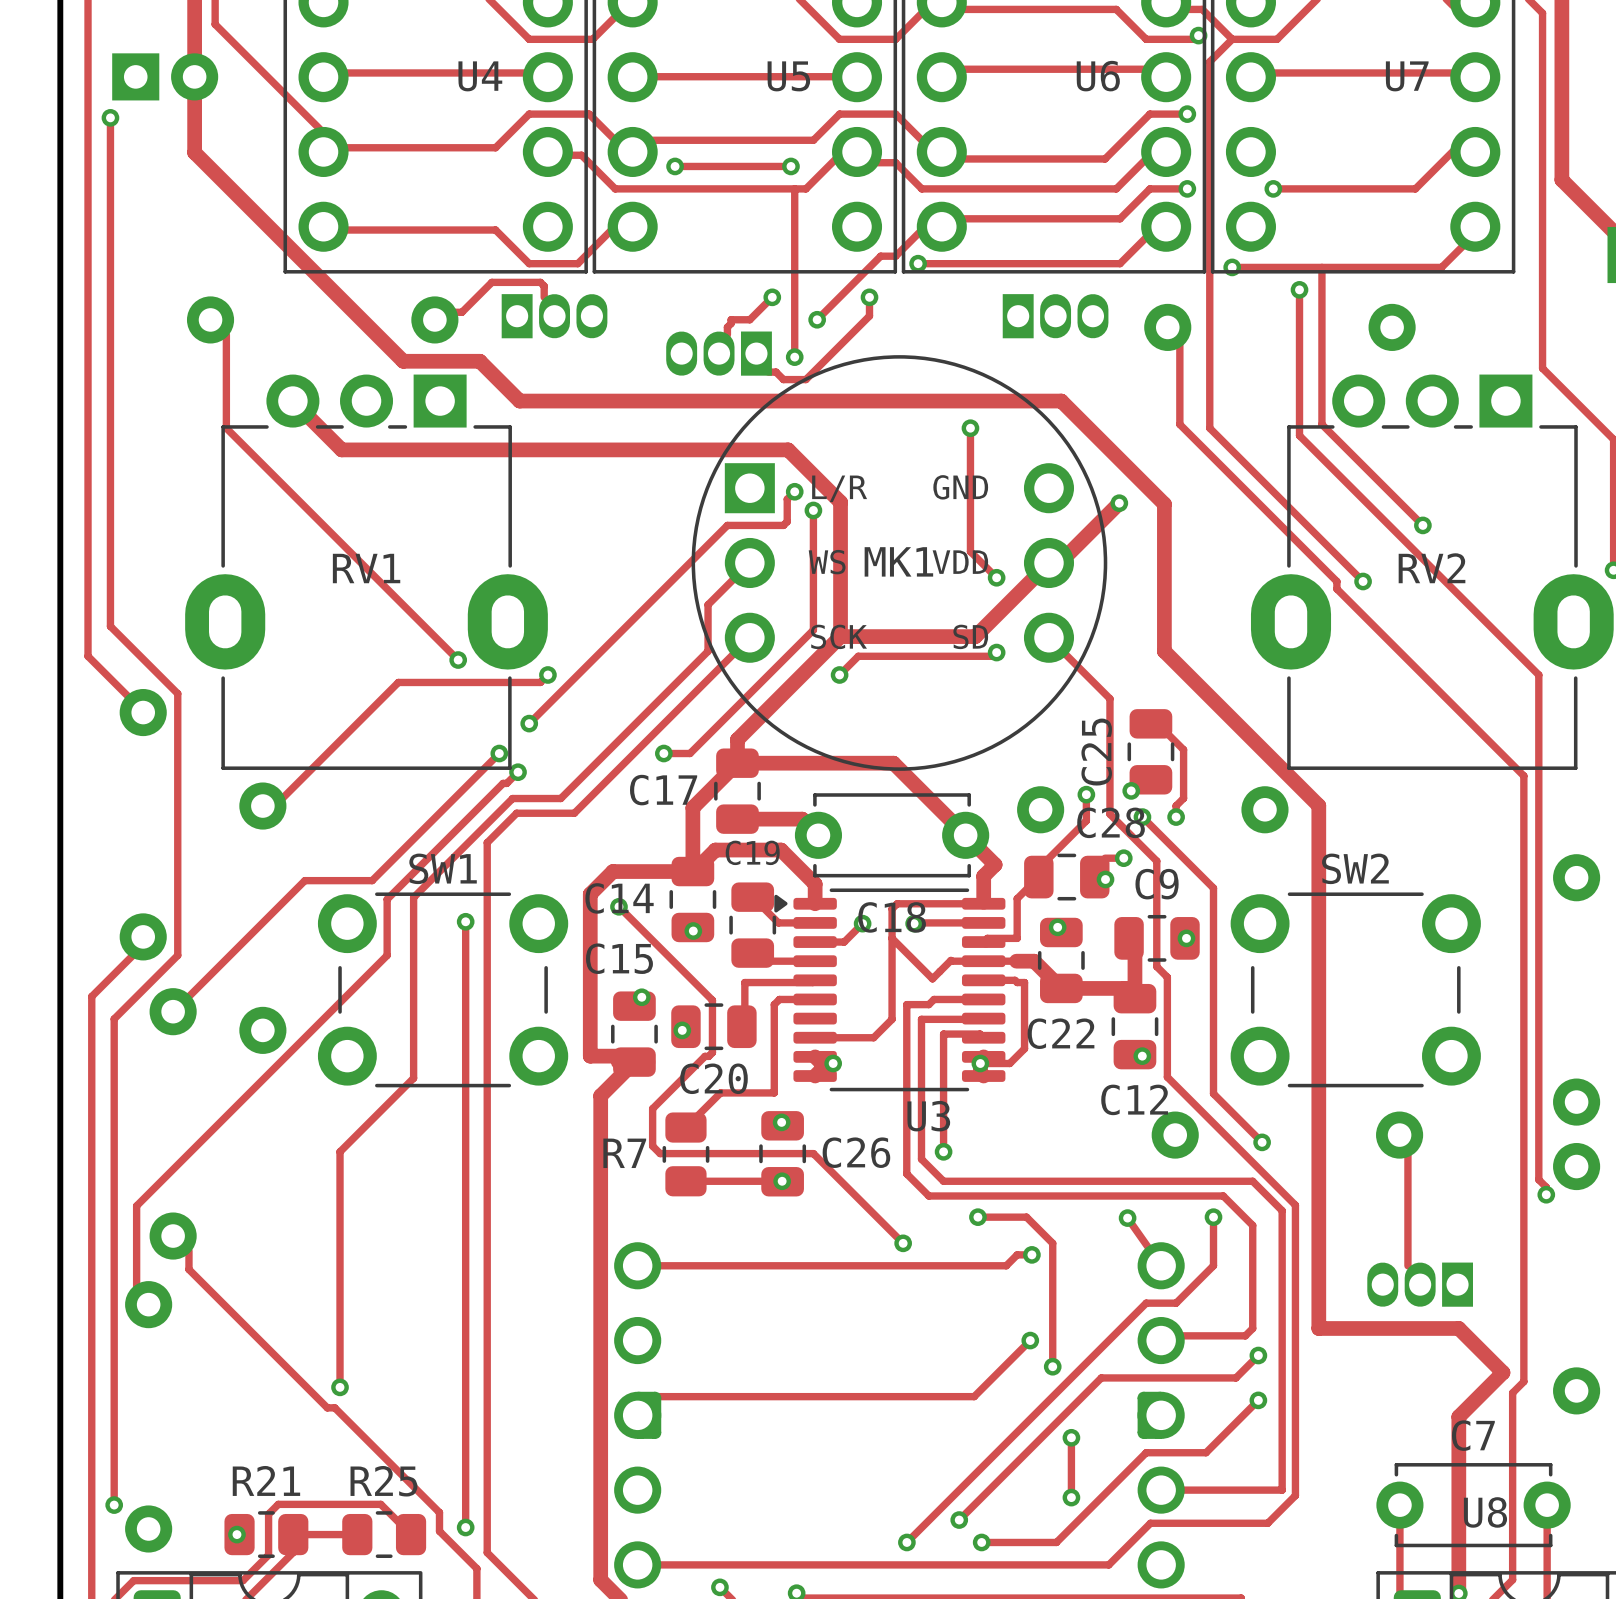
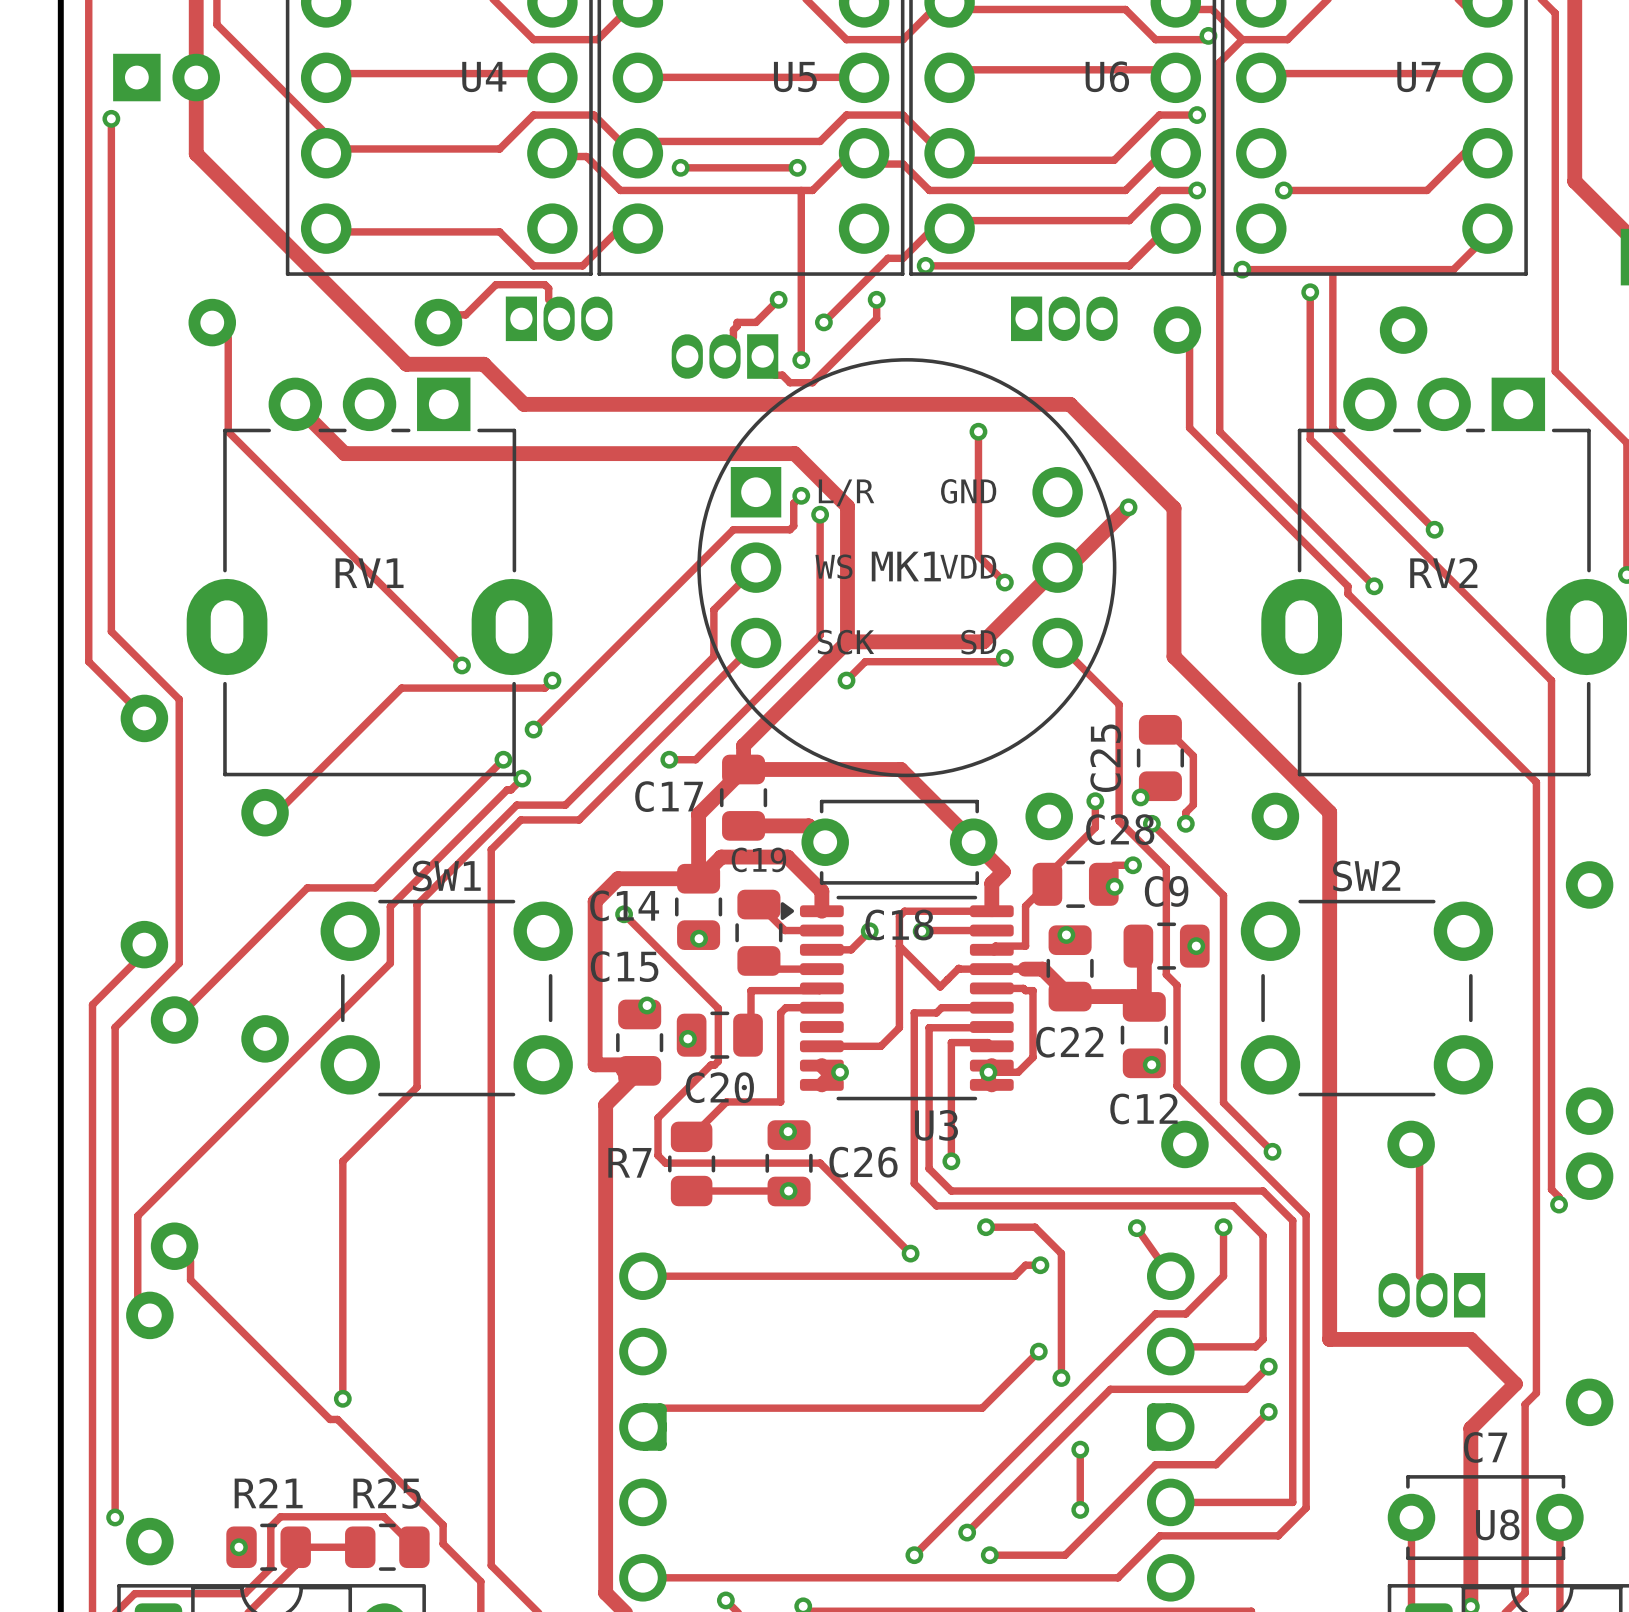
track: (465, 921) (465, 1527) -> none
via: (465, 921) -> none
via: (465, 1527) -> none

